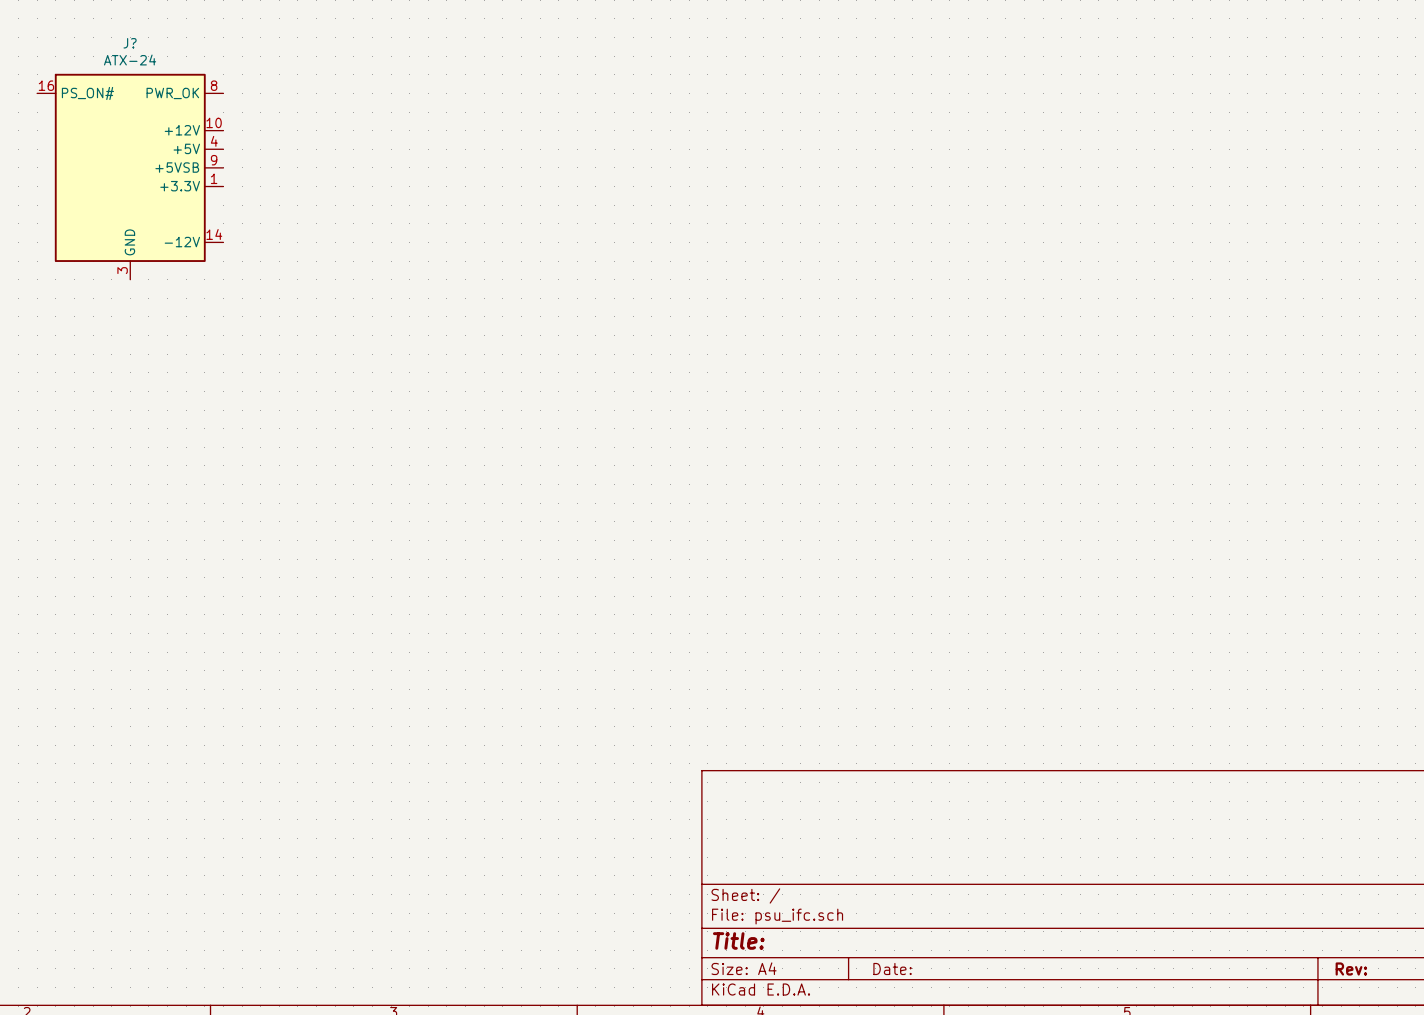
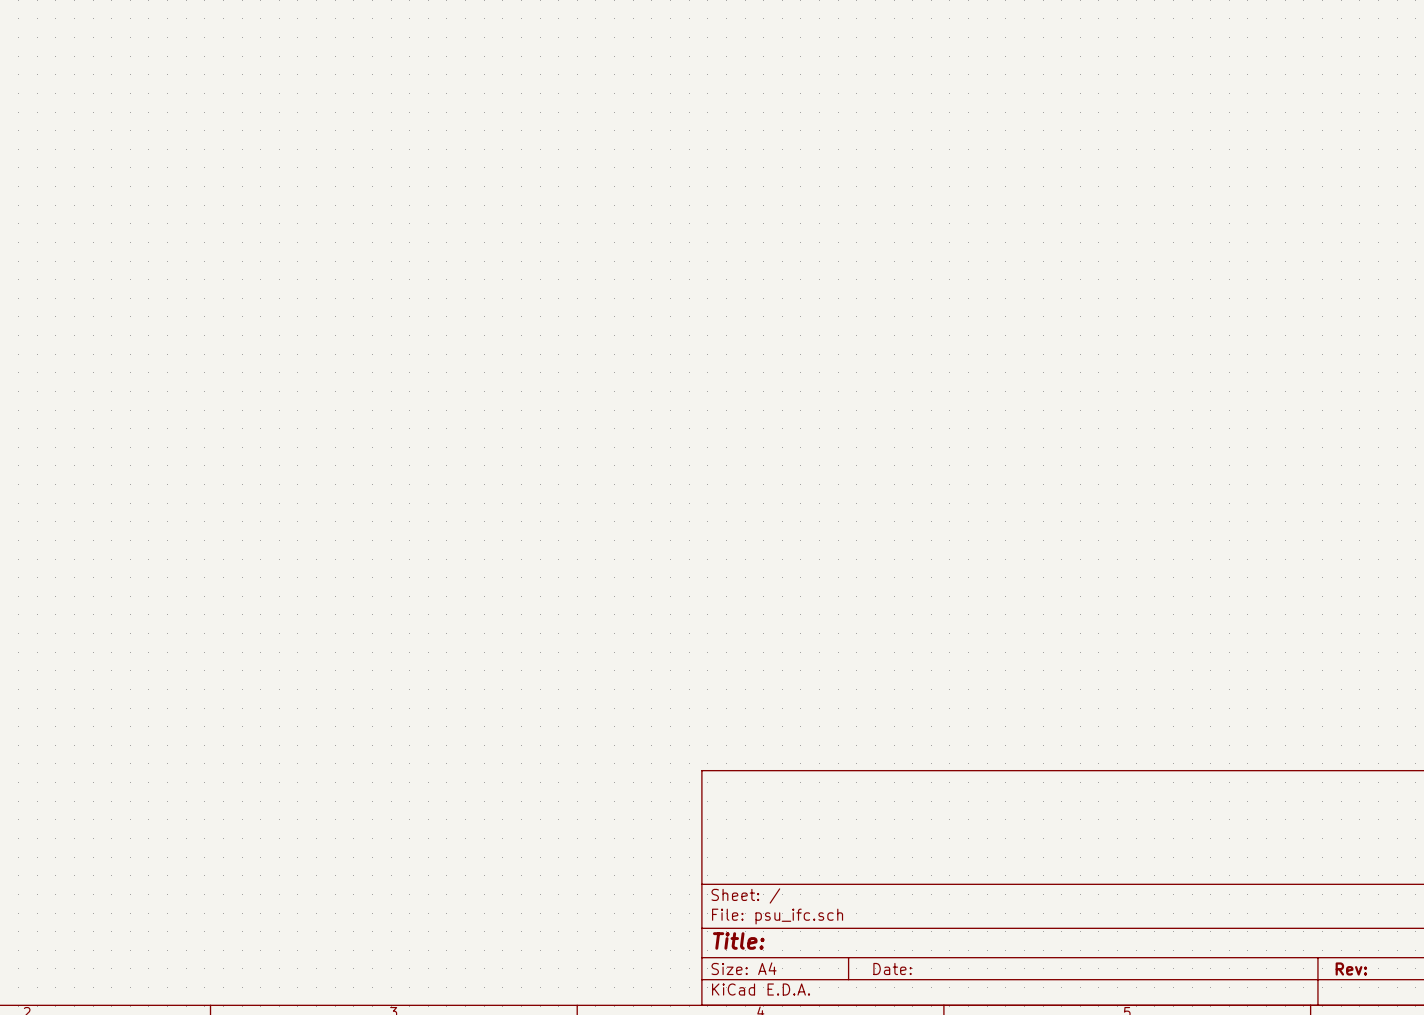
J?: ATX-24 (130, 176) -> none

